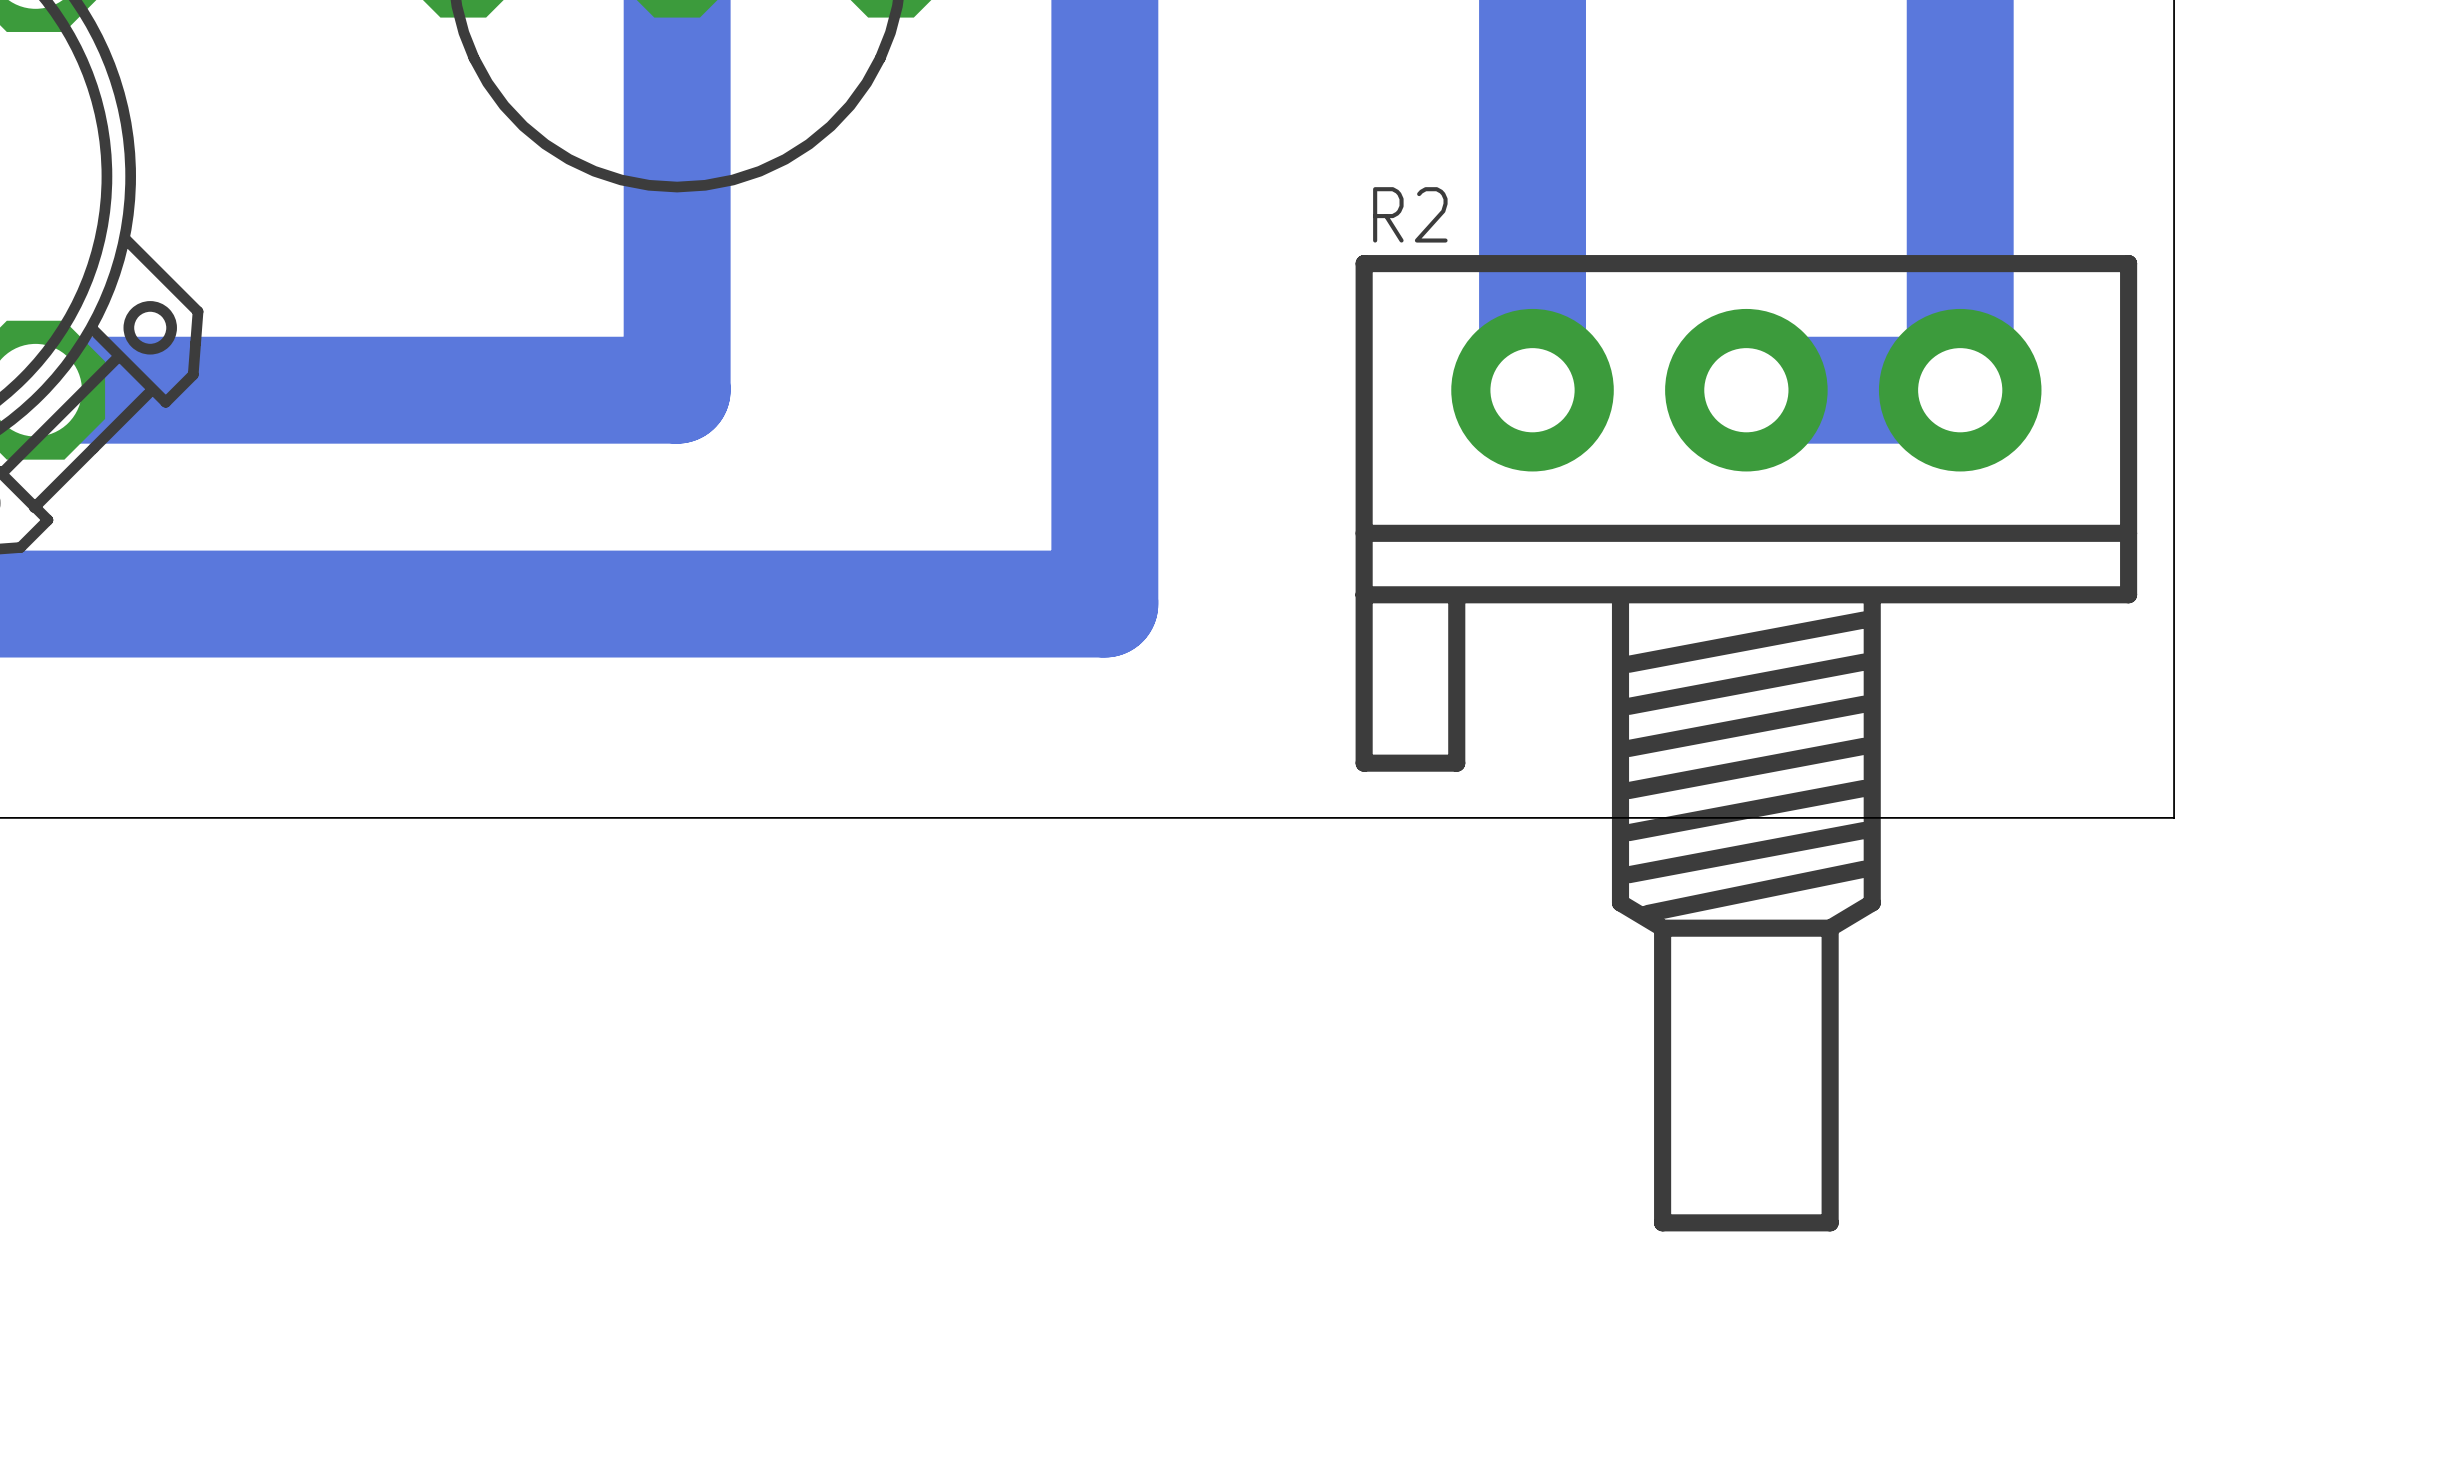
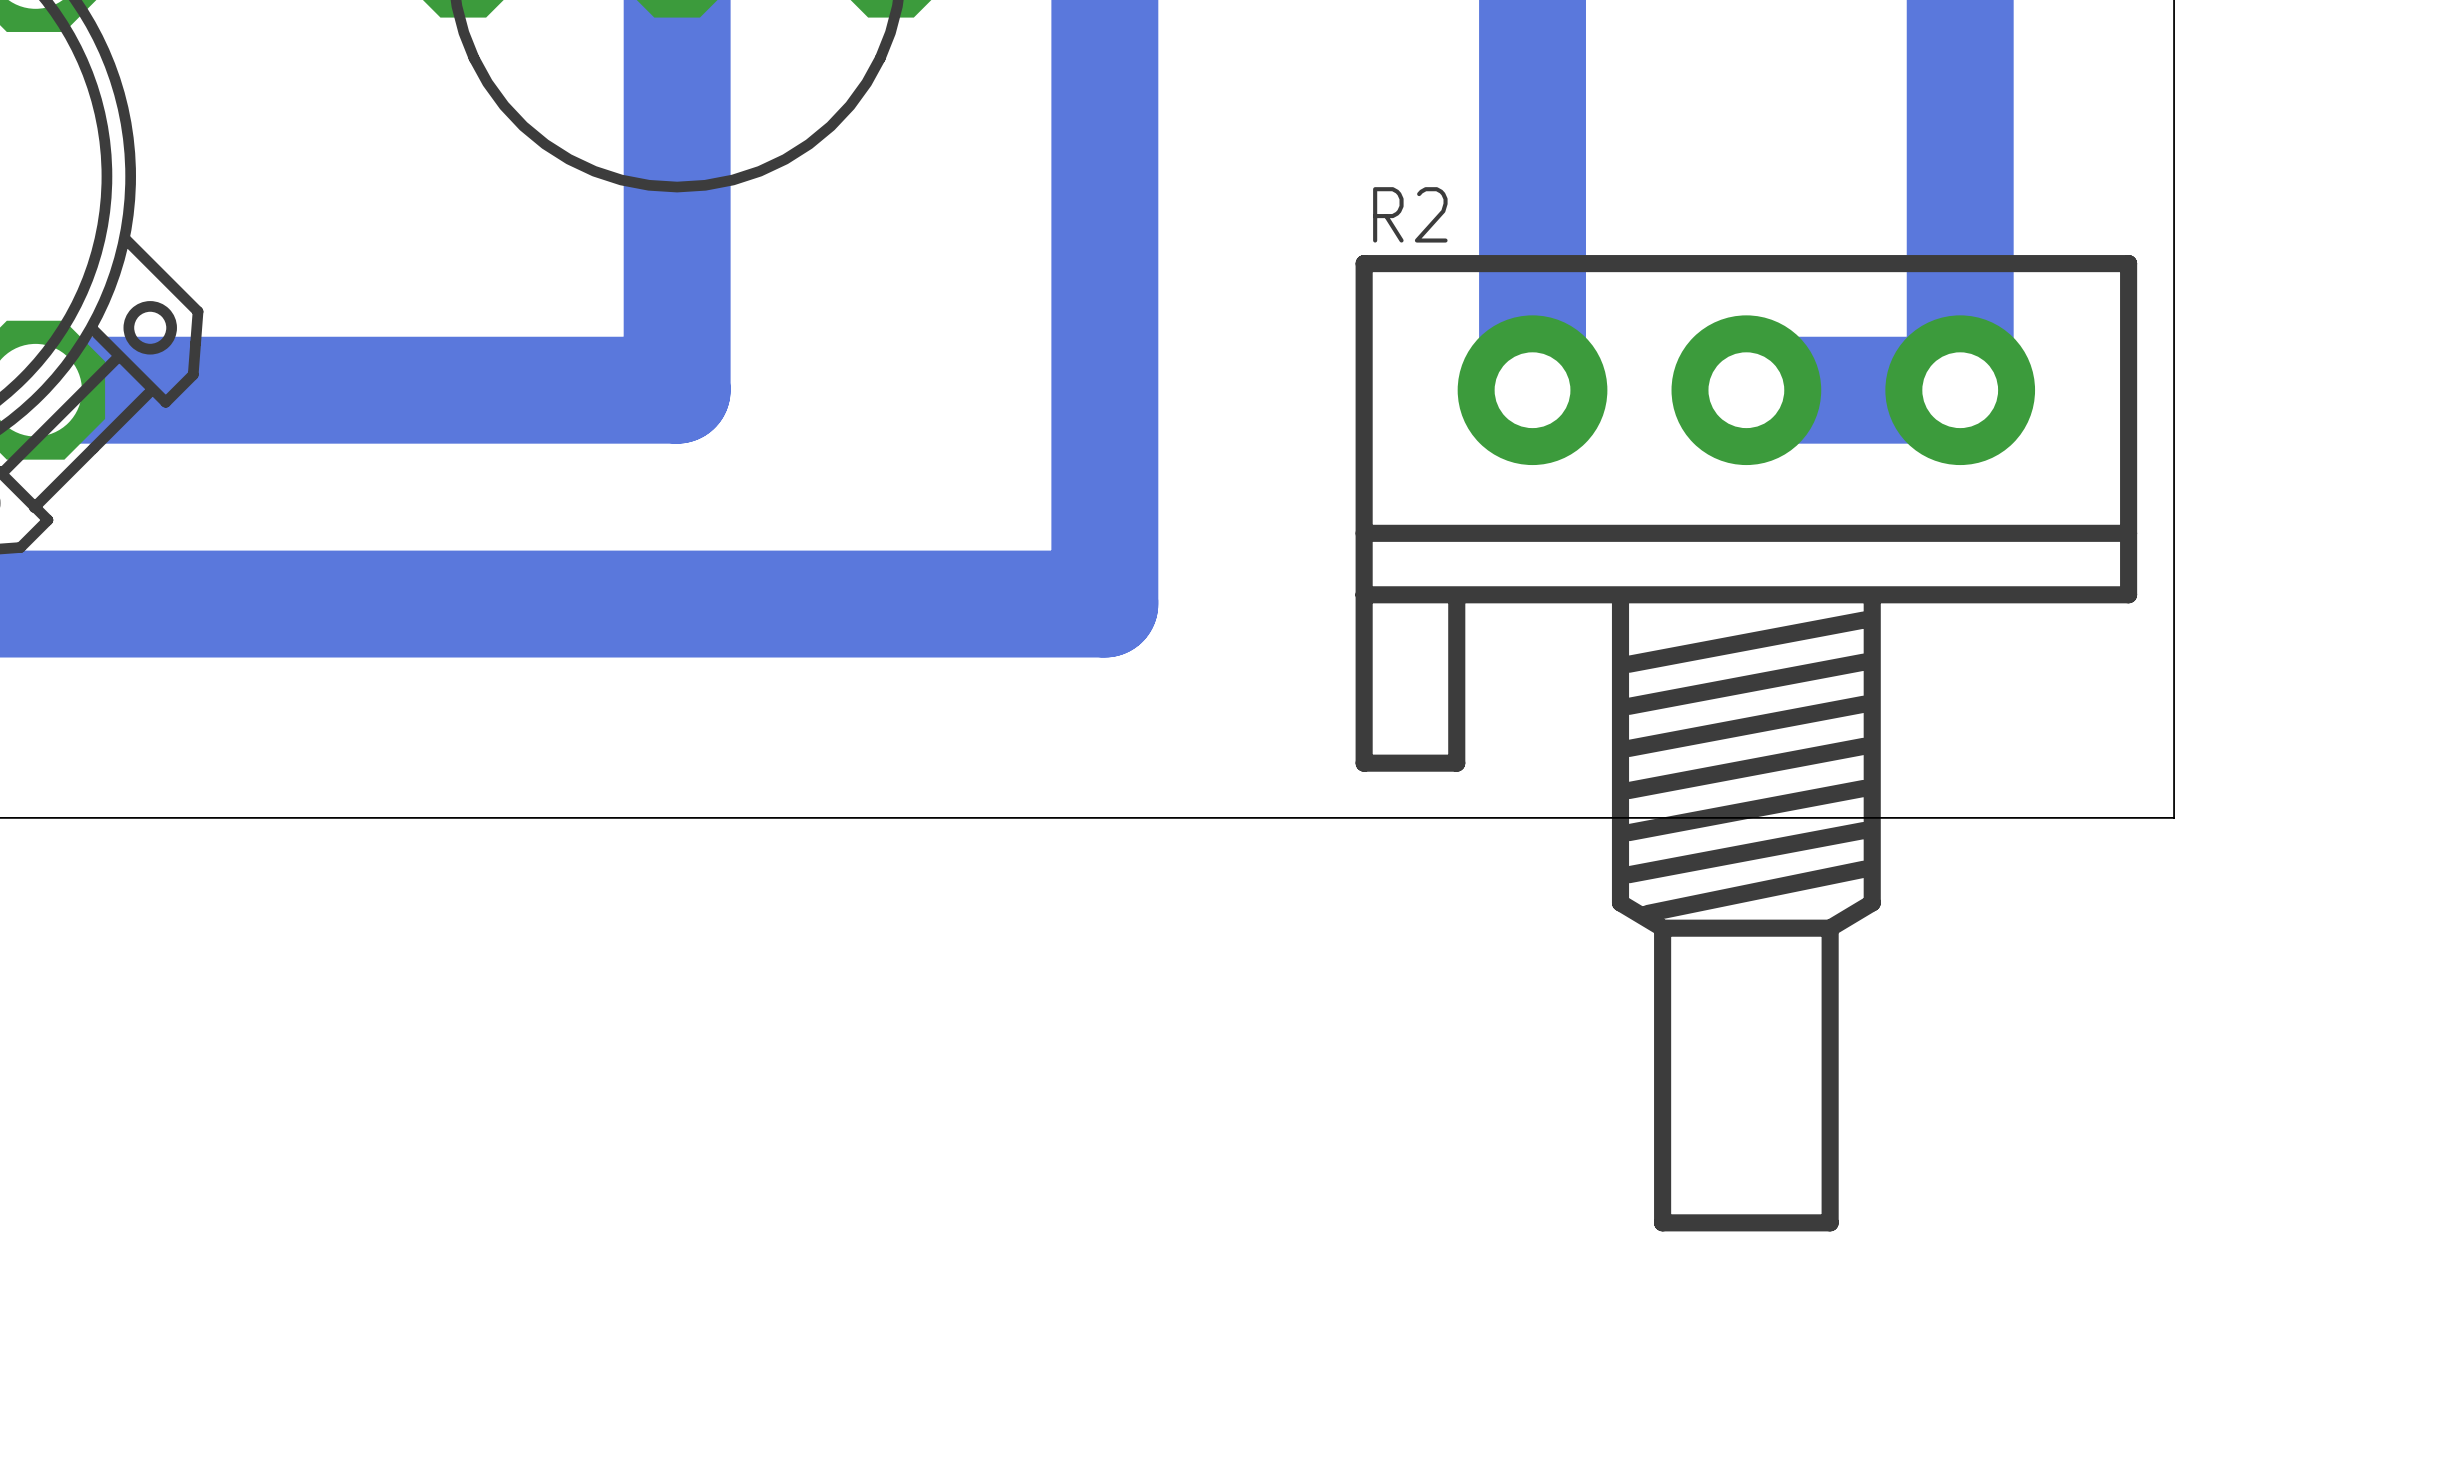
R2 footprint: [1355, 255, 2138, 1232] -> [1355, 255, 2138, 1232]

